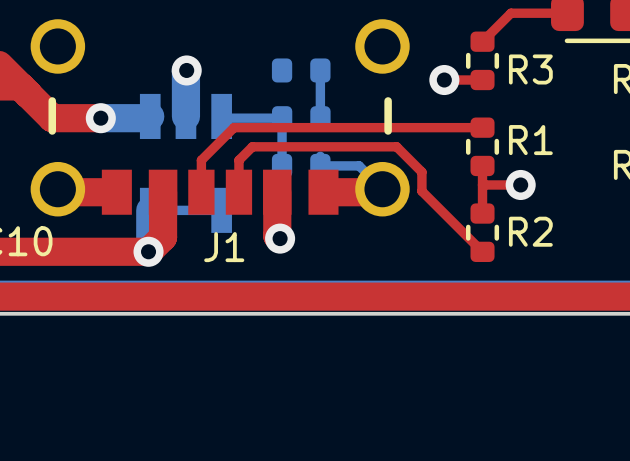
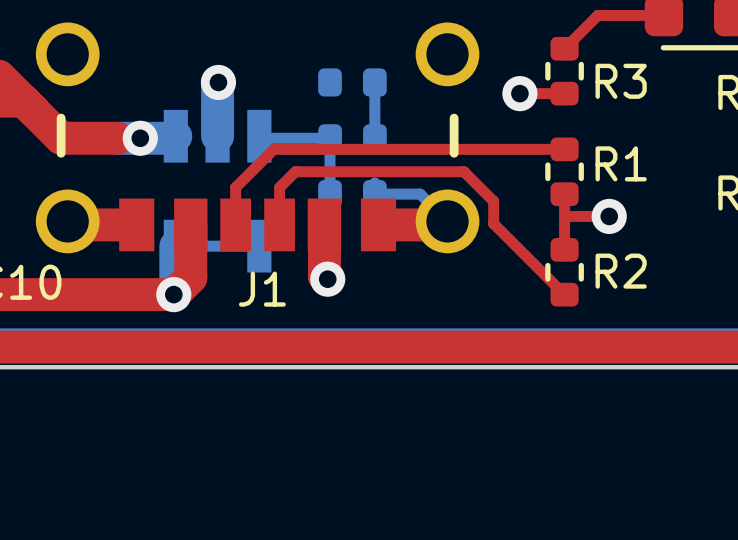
via position: (100, 118) -> (140, 138)

